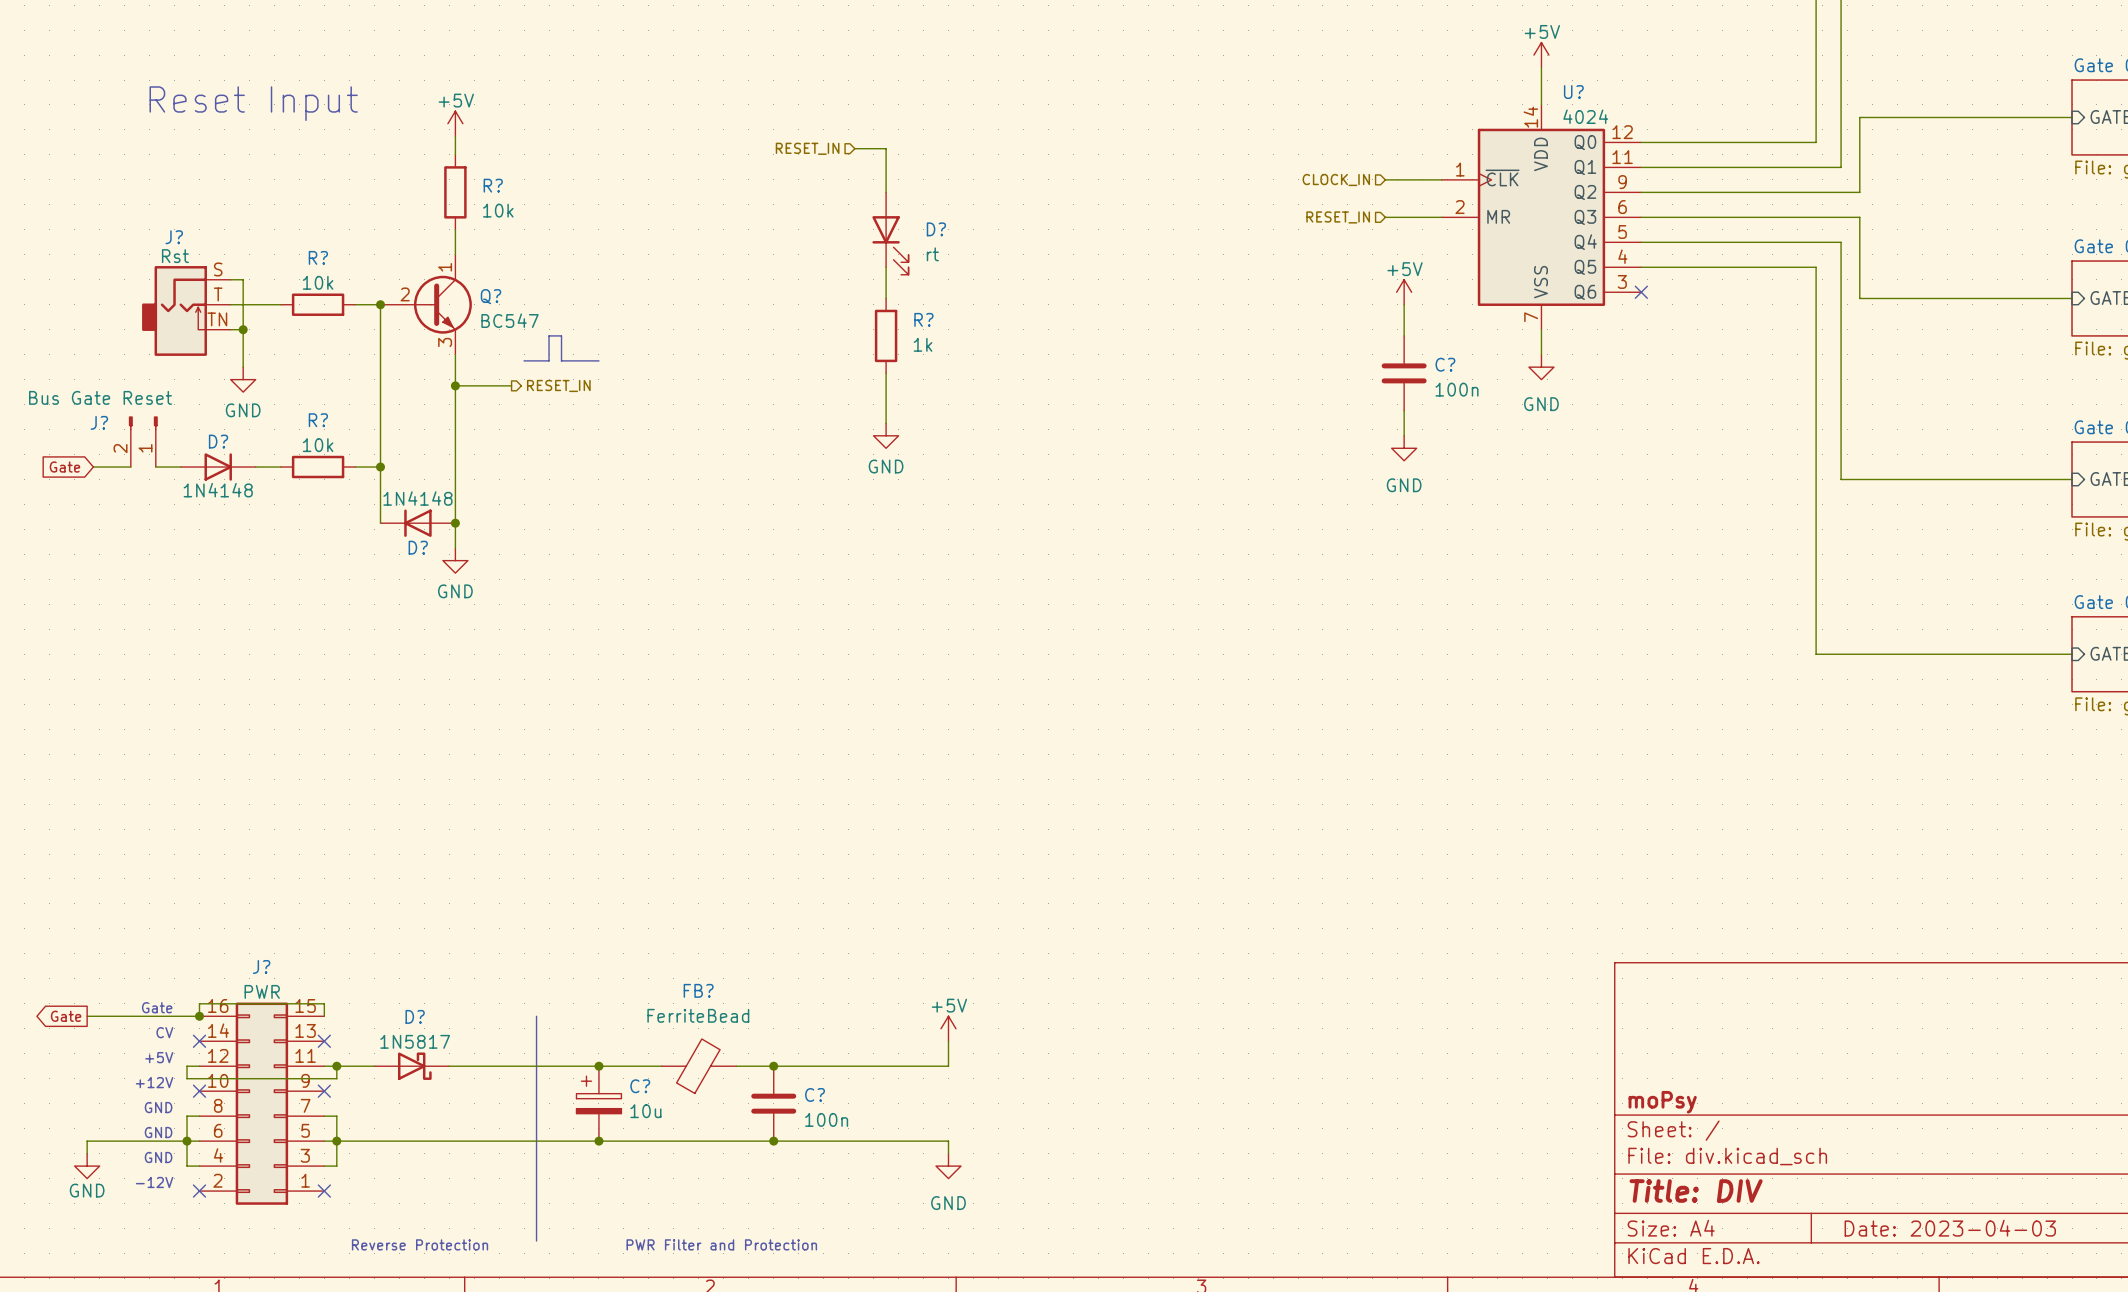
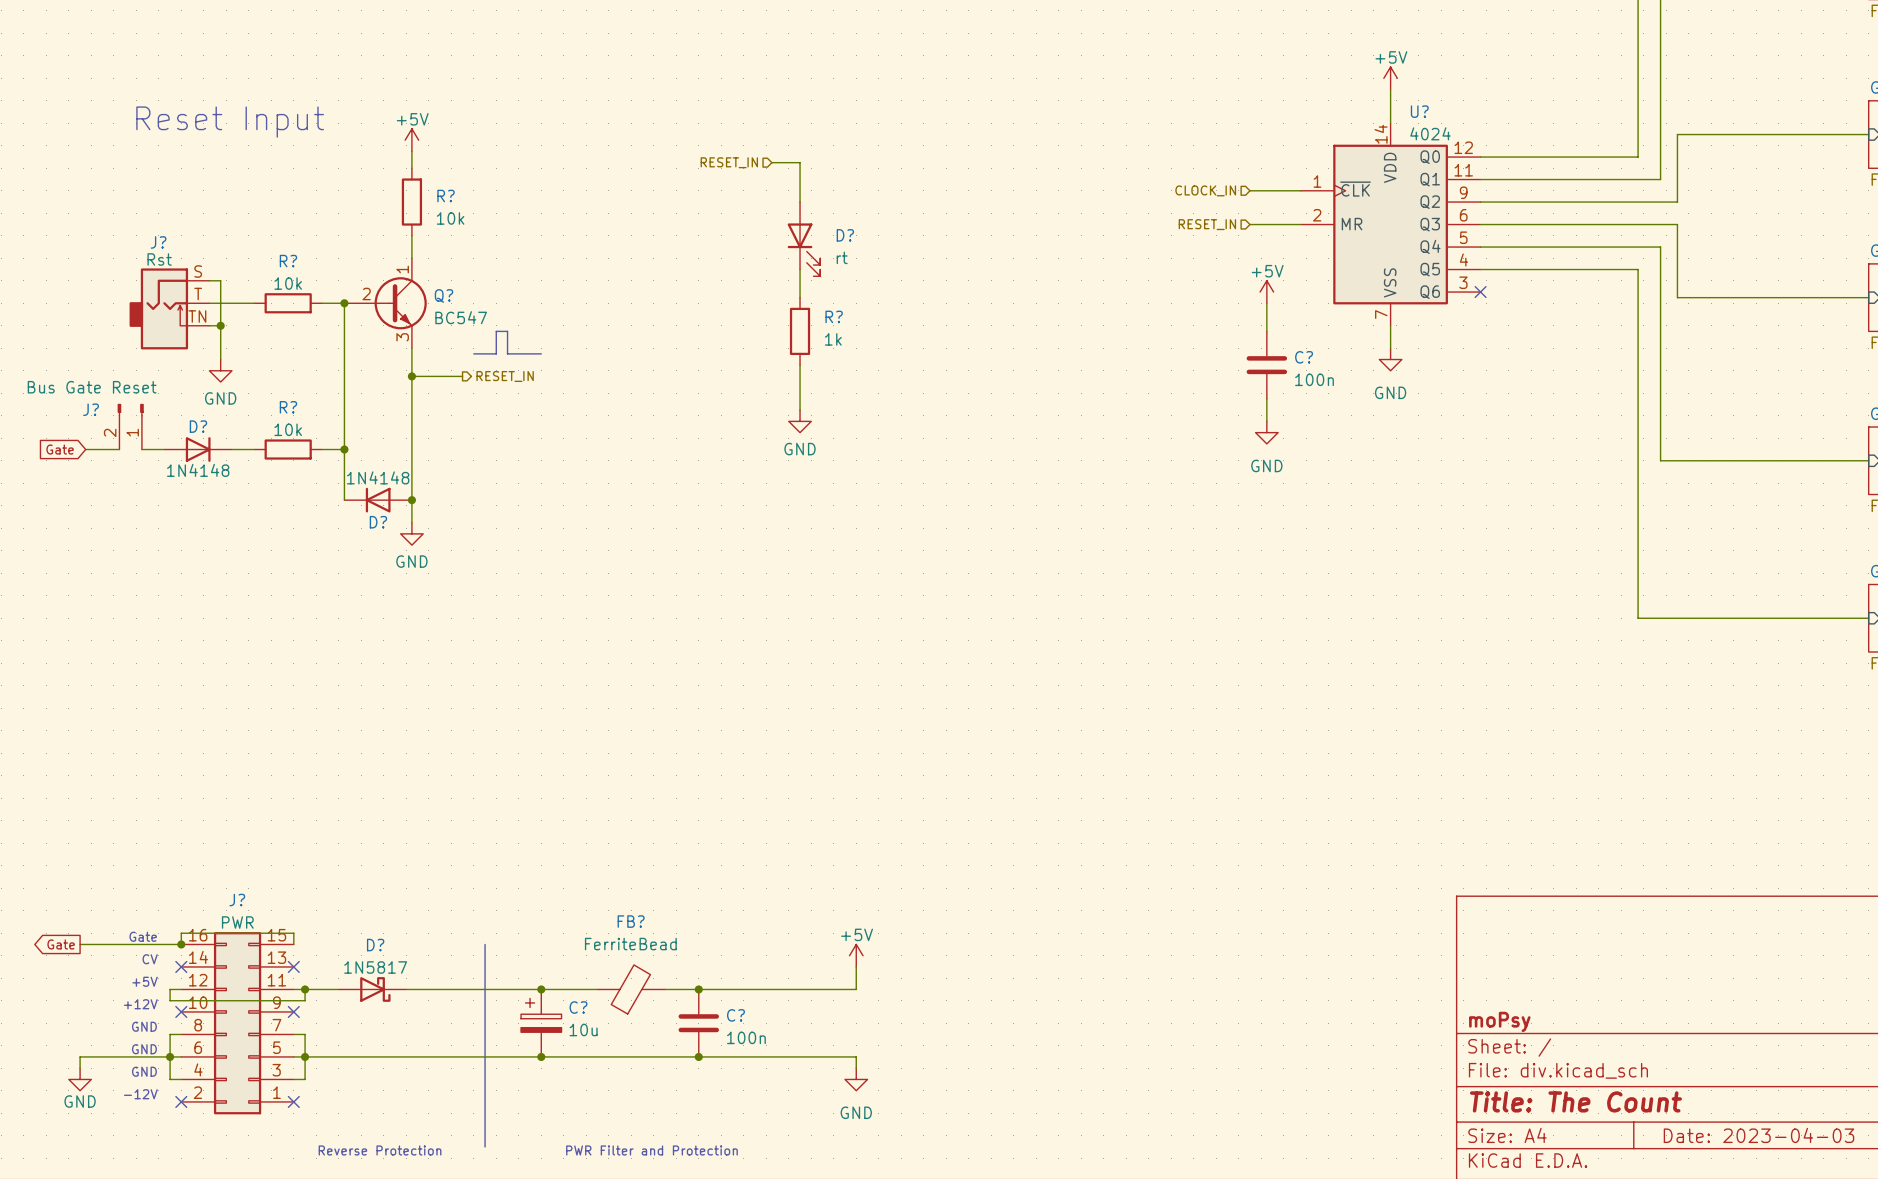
title block: Title: DIV (1696, 1191) -> Title: The Count (1575, 1101)

